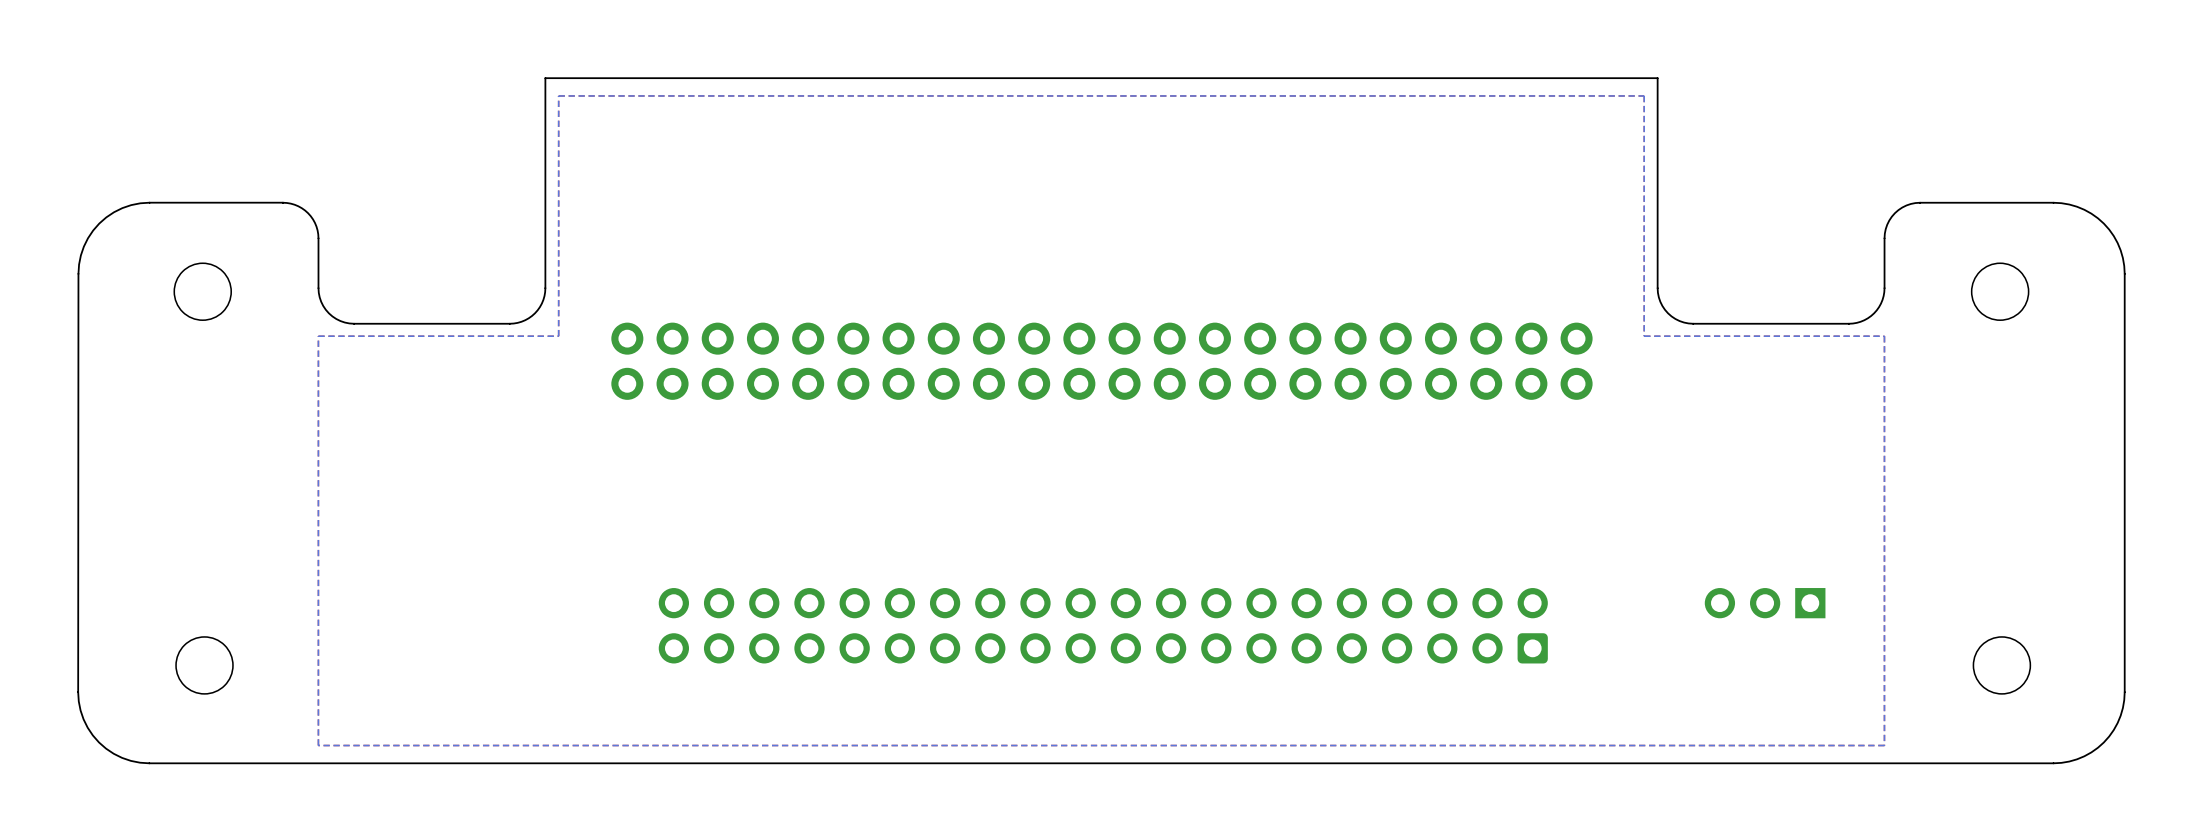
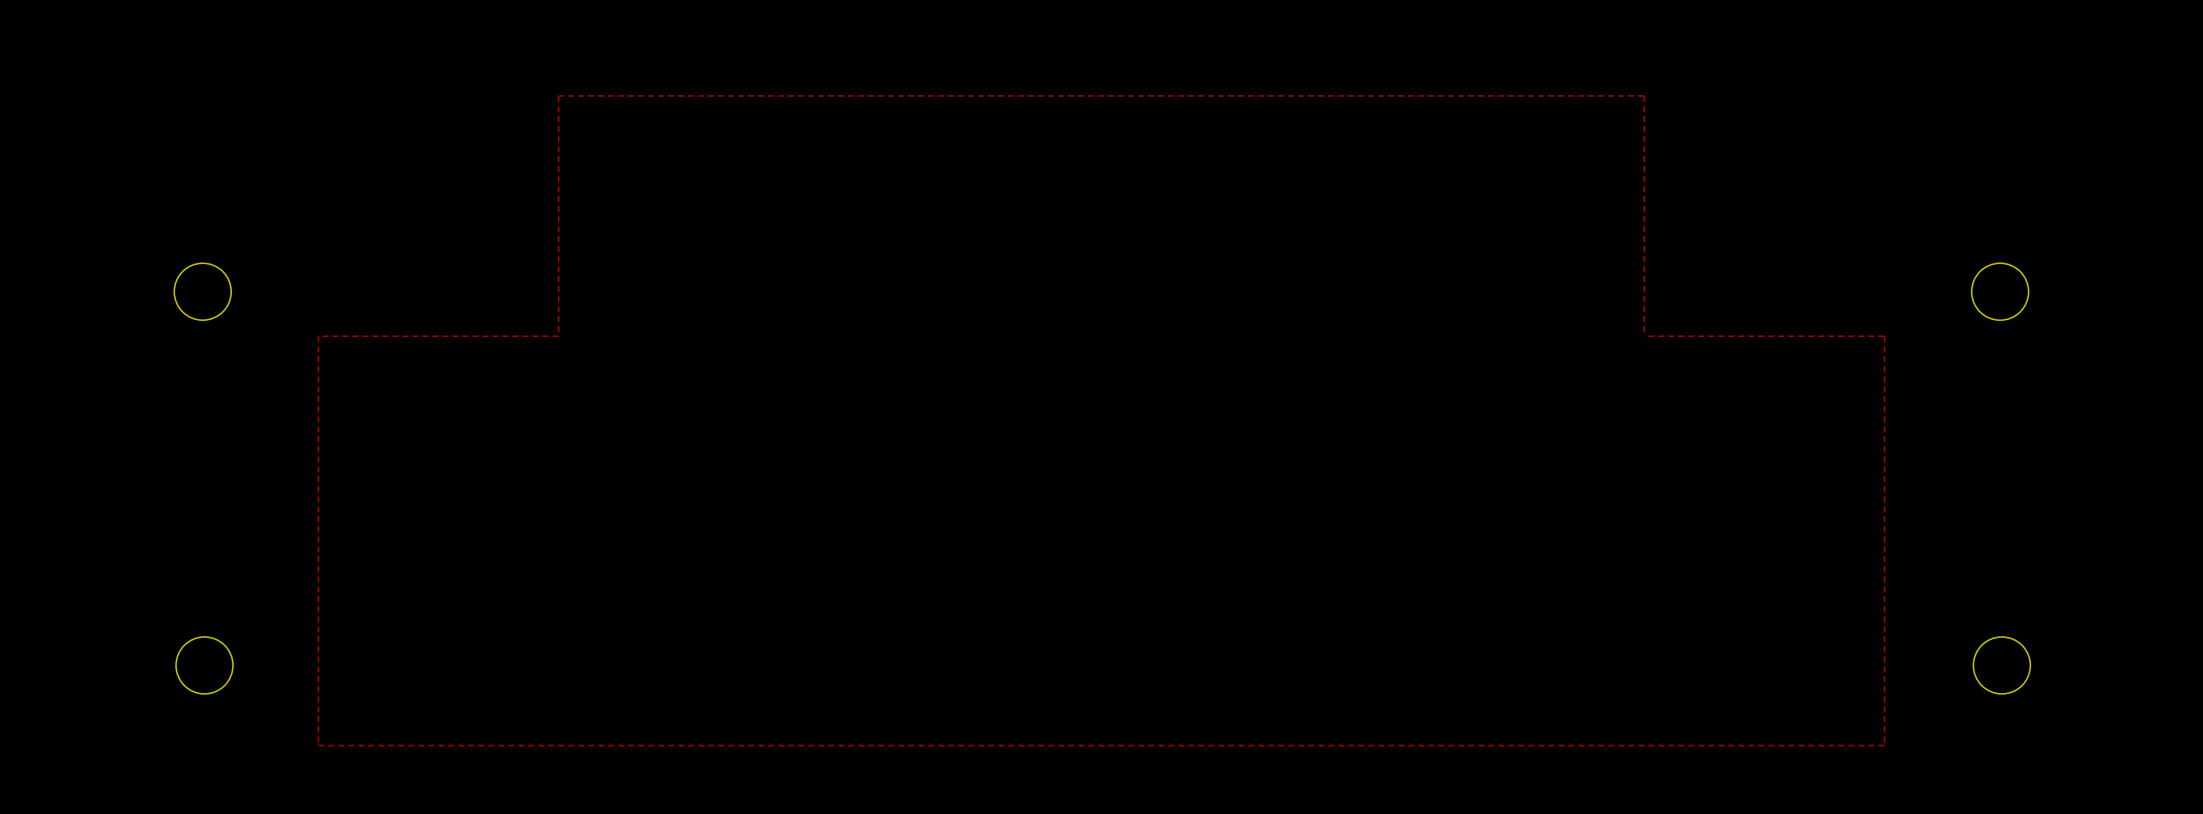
bottom zone outline: (1644, 95) (558, 95) (558, 336) (318, 336) (318, 745) (1884, 745) (1884, 336) (1644, 336) (1644, 95) -> none
board edge: (283, 202) (149, 202) (131, 205) (114, 212) (99, 223) (87, 238) (80, 255) (78, 273) (78, 701) (83, 719) (92, 735) (106, 748) (130, 760) (149, 763) (2053, 763) (2077, 759) (2097, 747) (2113, 730) (2122, 707) (2124, 692) (2124, 273) (2120, 250) (2109, 229) (2091, 213) (2077, 206) (2061, 203) (1910, 203) (1898, 210) (1887, 224) (1884, 238) (1883, 296) (1876, 310) (1864, 320) (1848, 323) (1684, 322) (1668, 313) (1660, 301) (1657, 292) (1657, 78) (545, 78) (545, 292) (541, 303) (534, 313) (525, 320) (513, 323) (354, 323) (336, 318) (325, 309) (319, 297) (318, 234) (314, 222) (301, 208) (282, 202) -> none
part: (1101, 361) -> none
part: (1765, 603) -> none
part: (1103, 625) -> none

